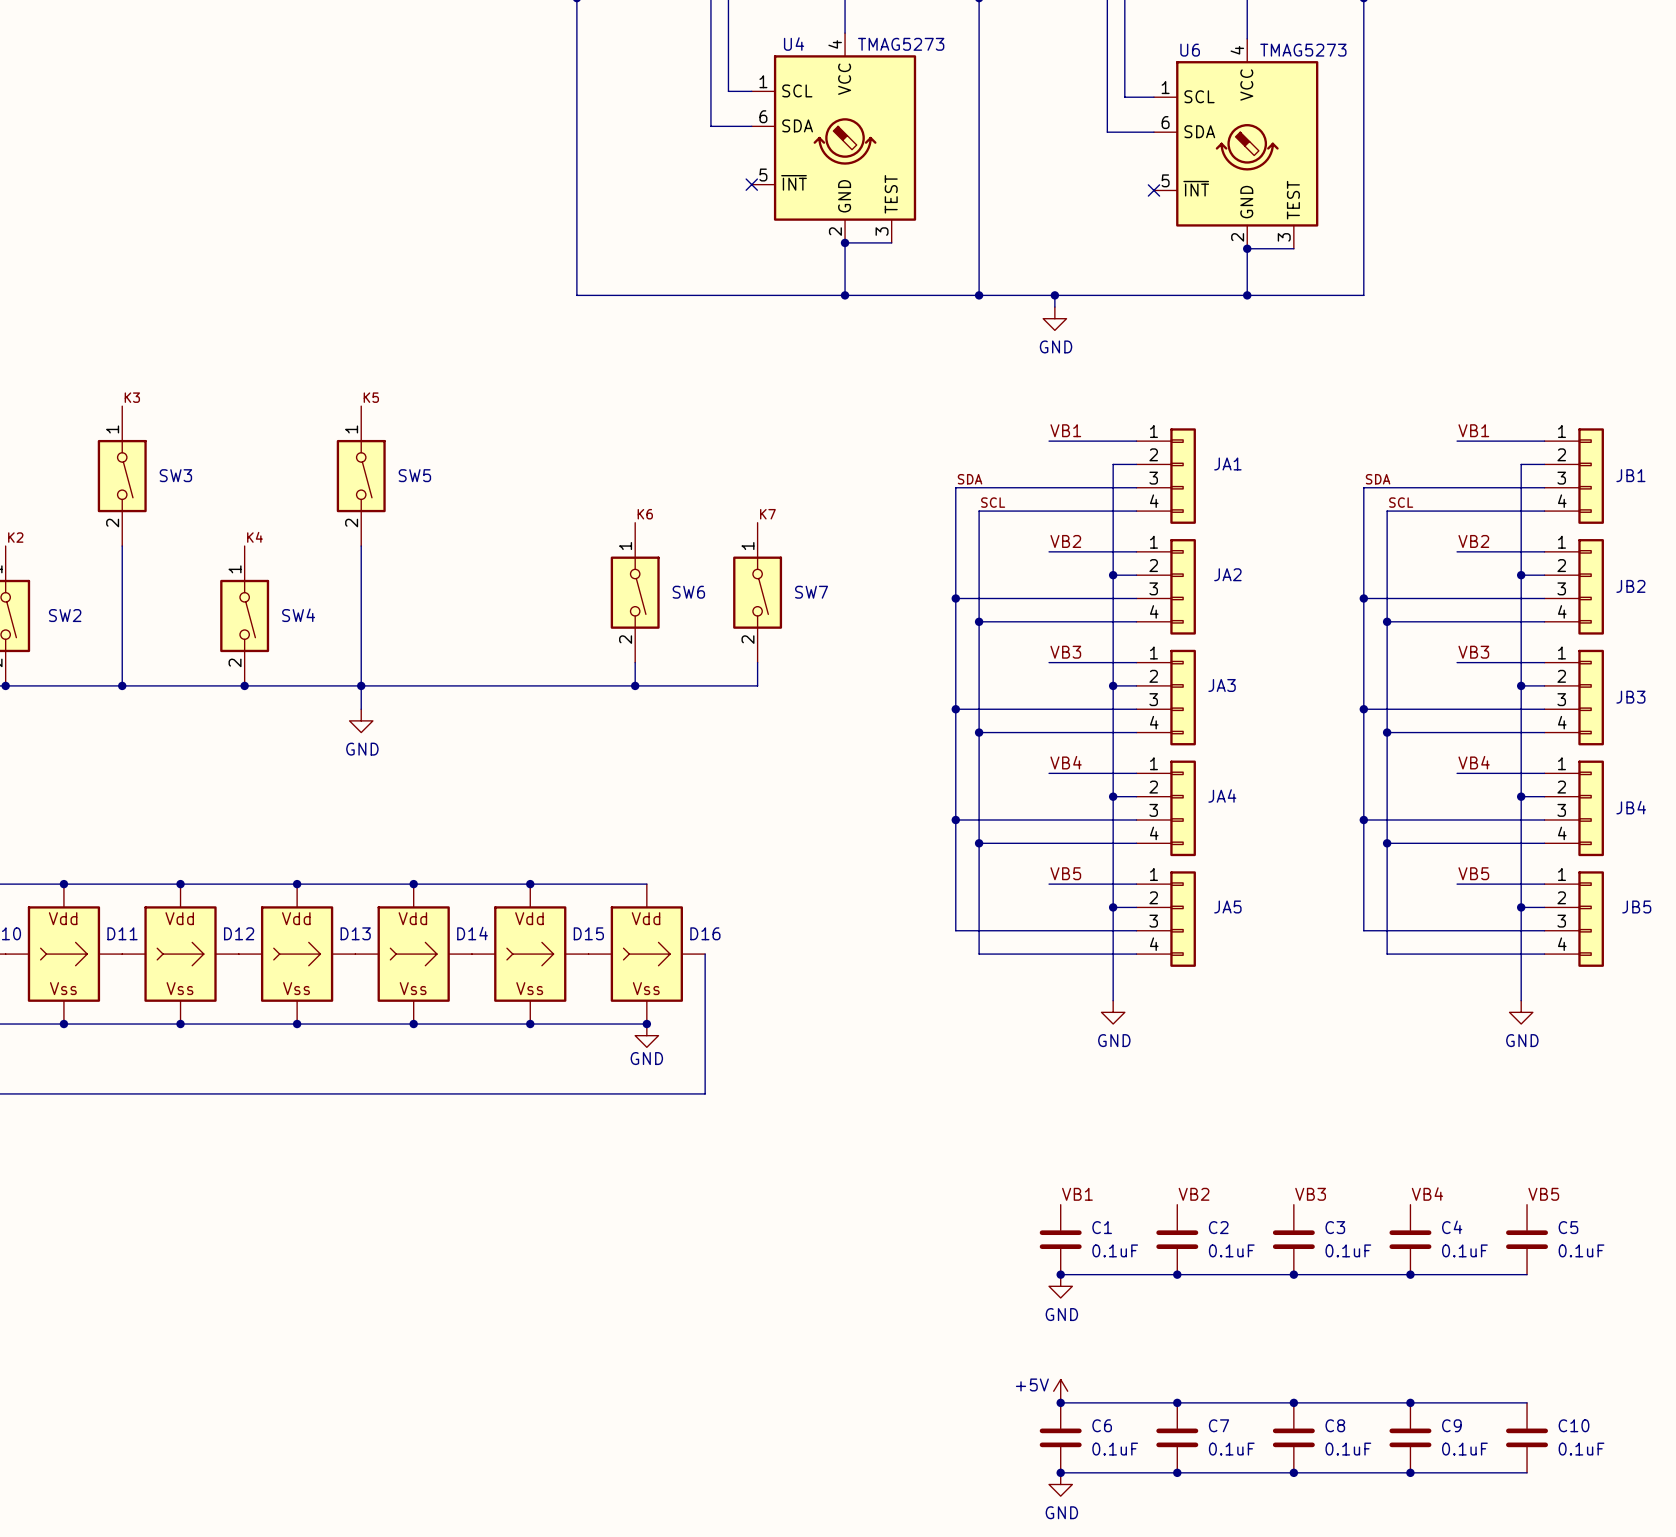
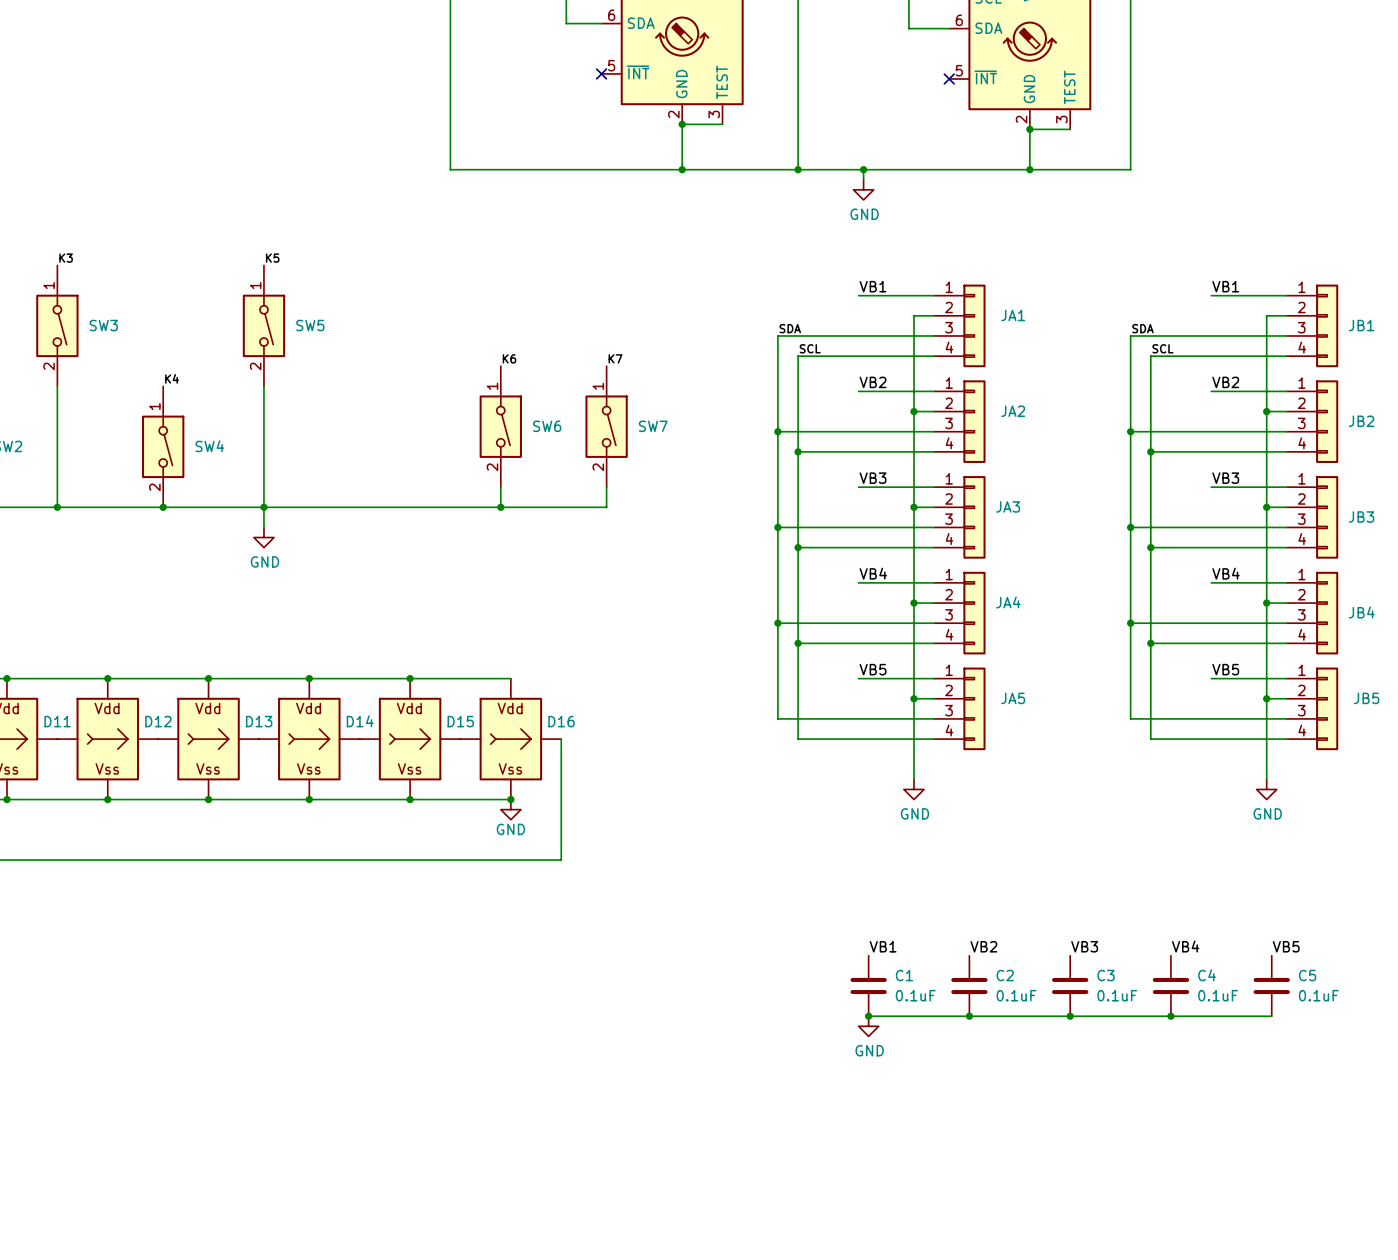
power symbol: +5V (1060, 1391) -> none
wire: (1060, 1402) (1527, 1402) -> none
junction: (1060, 1402) -> none
junction: (1177, 1402) -> none
junction: (1293, 1402) -> none
junction: (1410, 1402) -> none
C6: 0.1uF (1060, 1437) -> none
C7: 0.1uF (1177, 1437) -> none
C8: 0.1uF (1293, 1437) -> none
C9: 0.1uF (1410, 1437) -> none
C10: 0.1uF (1527, 1437) -> none
wire: (1060, 1472) (1527, 1472) -> none
junction: (1060, 1472) -> none
junction: (1177, 1472) -> none
junction: (1293, 1472) -> none
junction: (1410, 1472) -> none
power symbol: GND (1060, 1484) -> none

